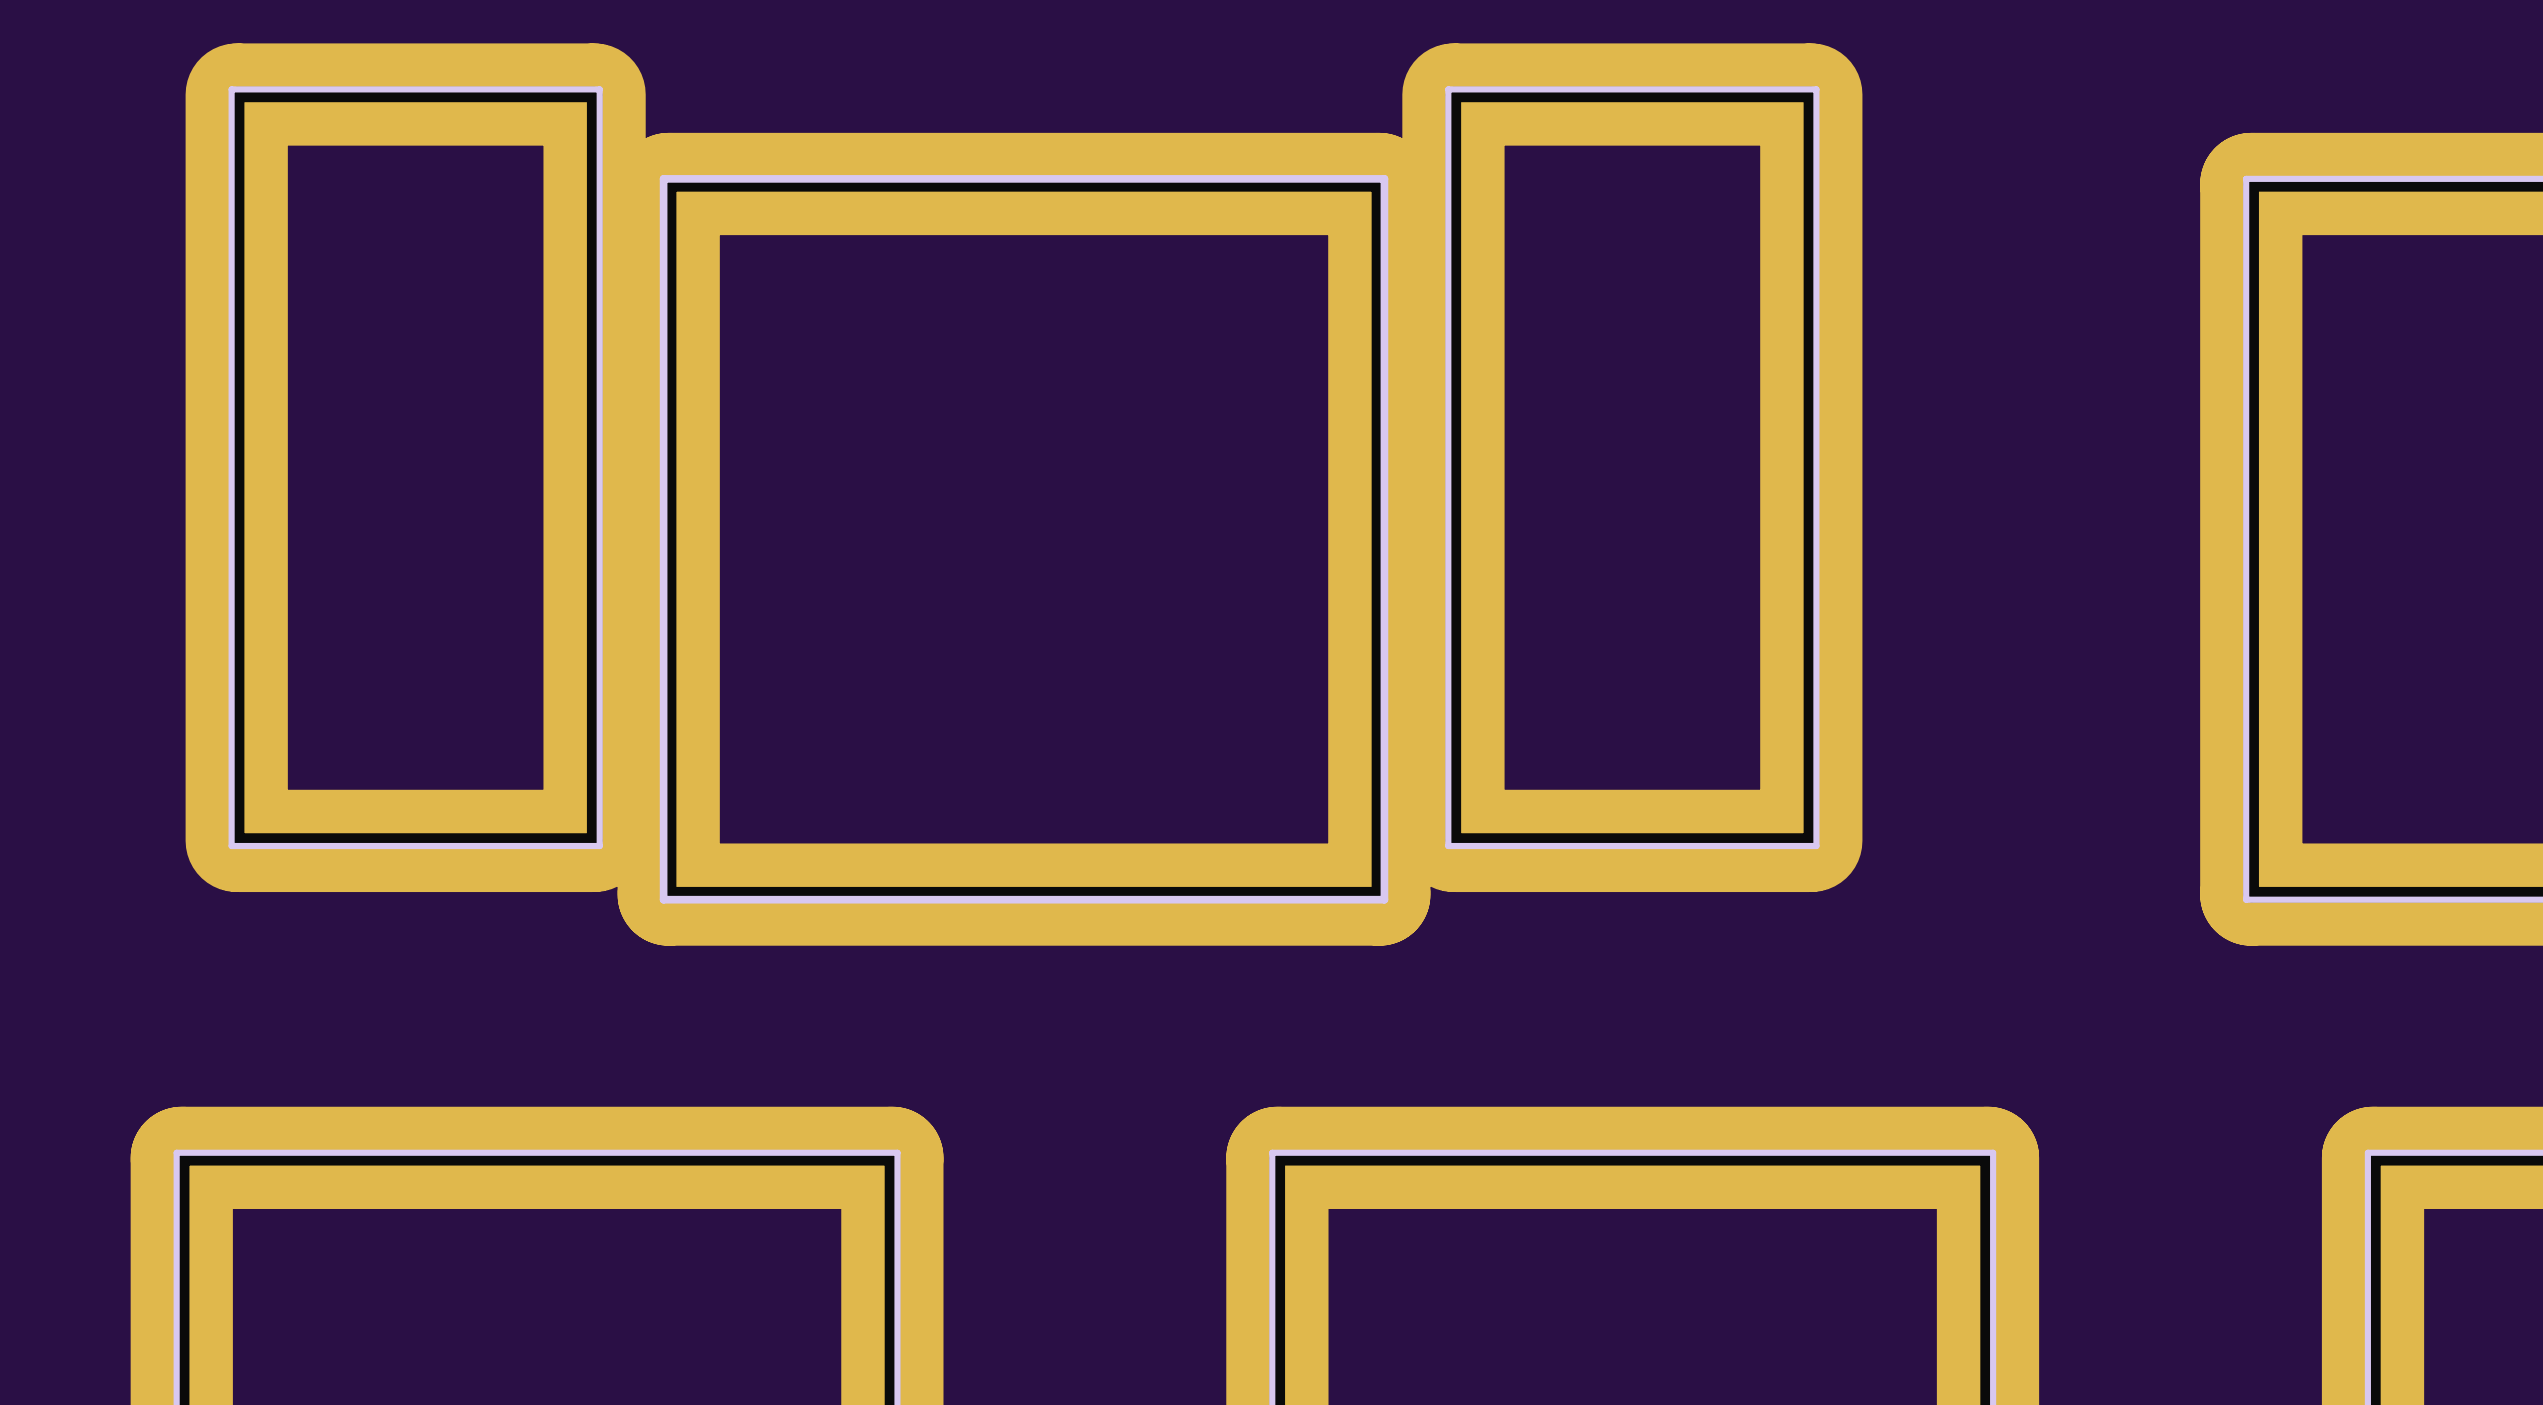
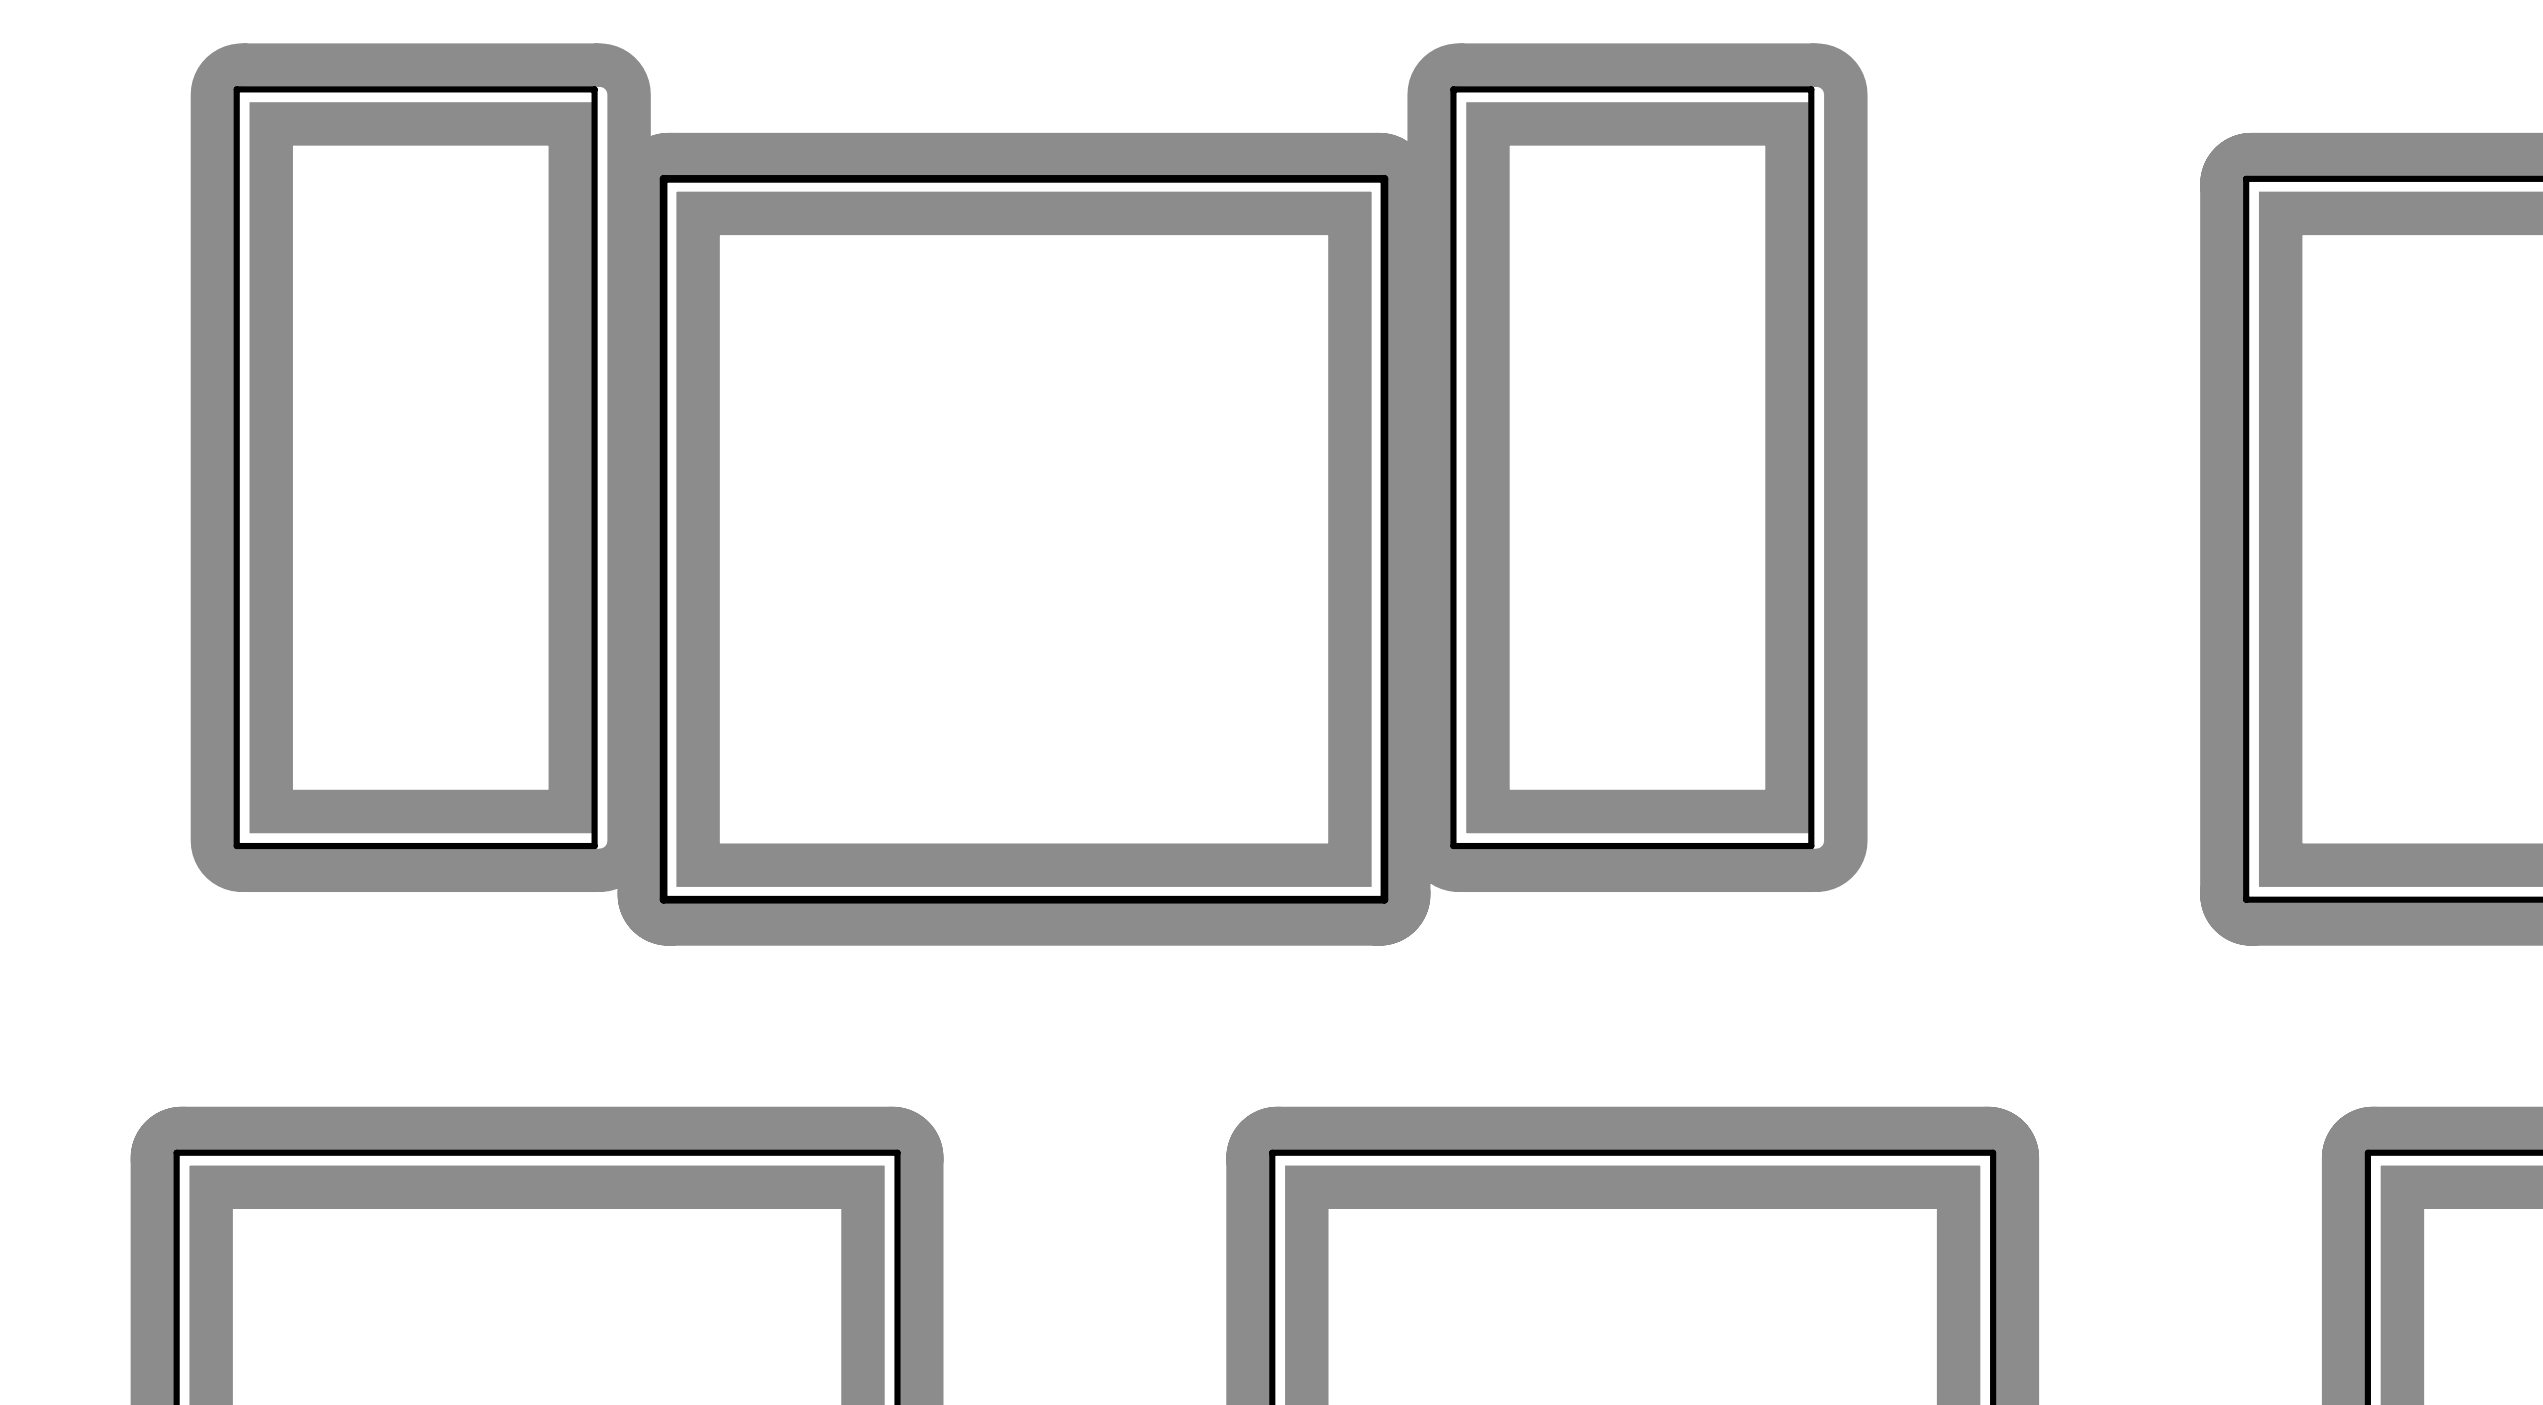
part footprint: [185, 43, 1863, 946] -> [190, 43, 1868, 946]

